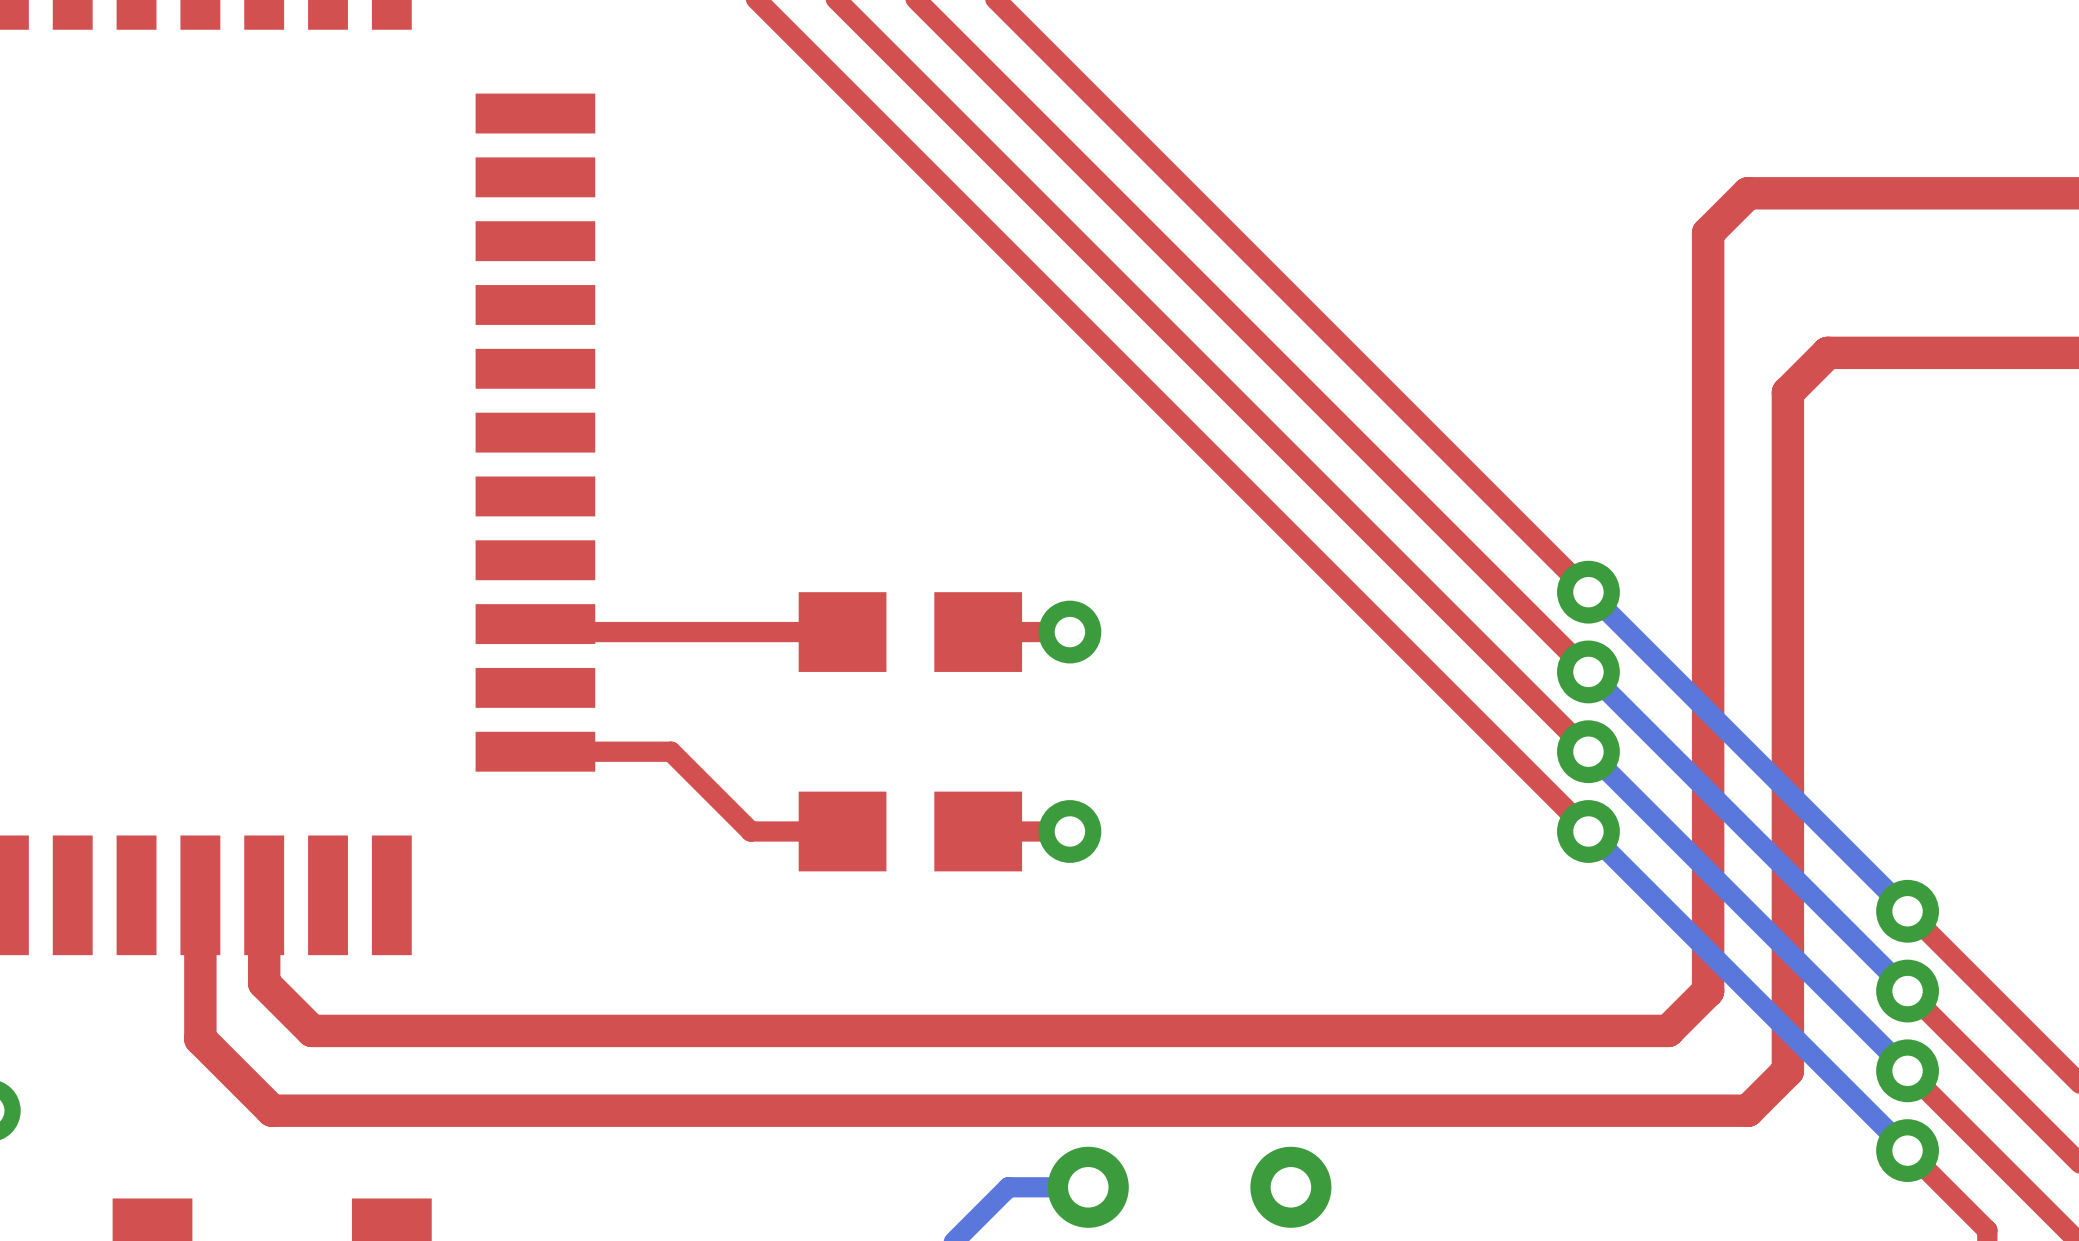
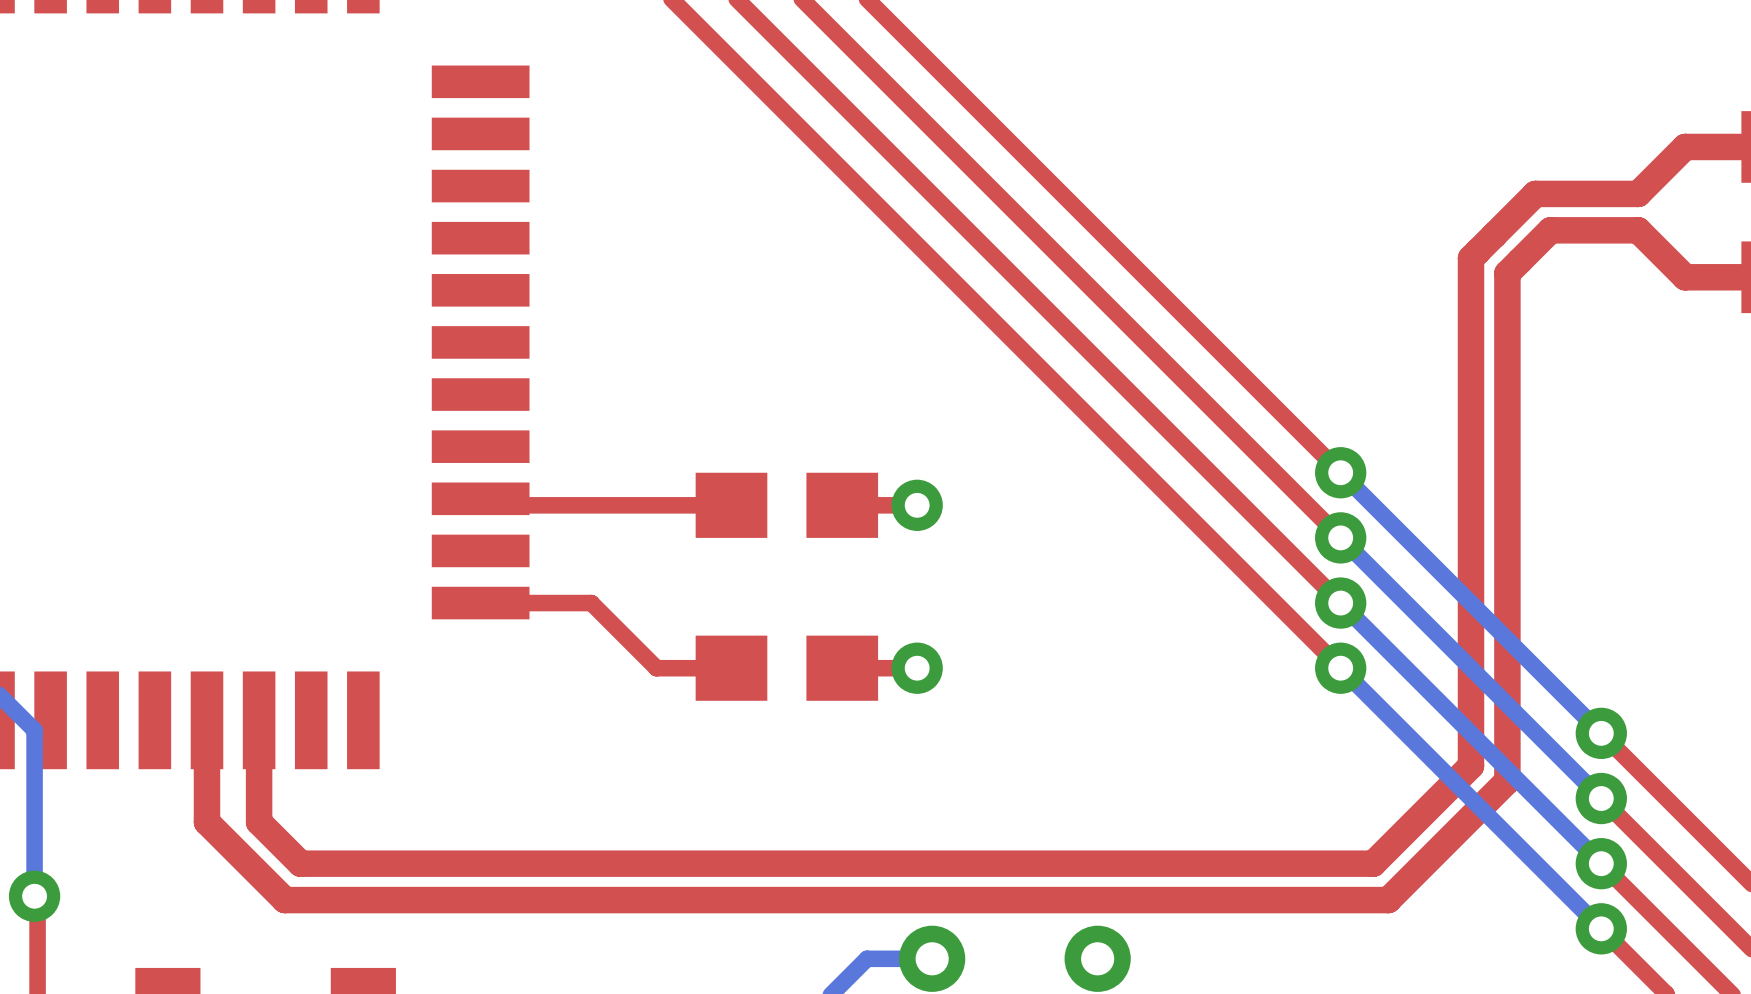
top track: (2010, 193) (1748, 193) (1708, 233) (1708, 991) -> (1685, 146) (1638, 193) (1535, 193) (1471, 258) (1471, 765) (1438, 798)
top track: (2010, 352) (1827, 352) (1787, 392) (1787, 1070) (1748, 1110) (272, 1110) (200, 1038) (200, 1019) -> (1685, 277) (1638, 230) (1550, 230) (1507, 273) (1507, 781) (1388, 900) (284, 900) (206, 822)
top track: (264, 983) (312, 1030) (1668, 1030) -> (259, 792) (259, 822) (300, 863) (1373, 863) (1405, 831)

